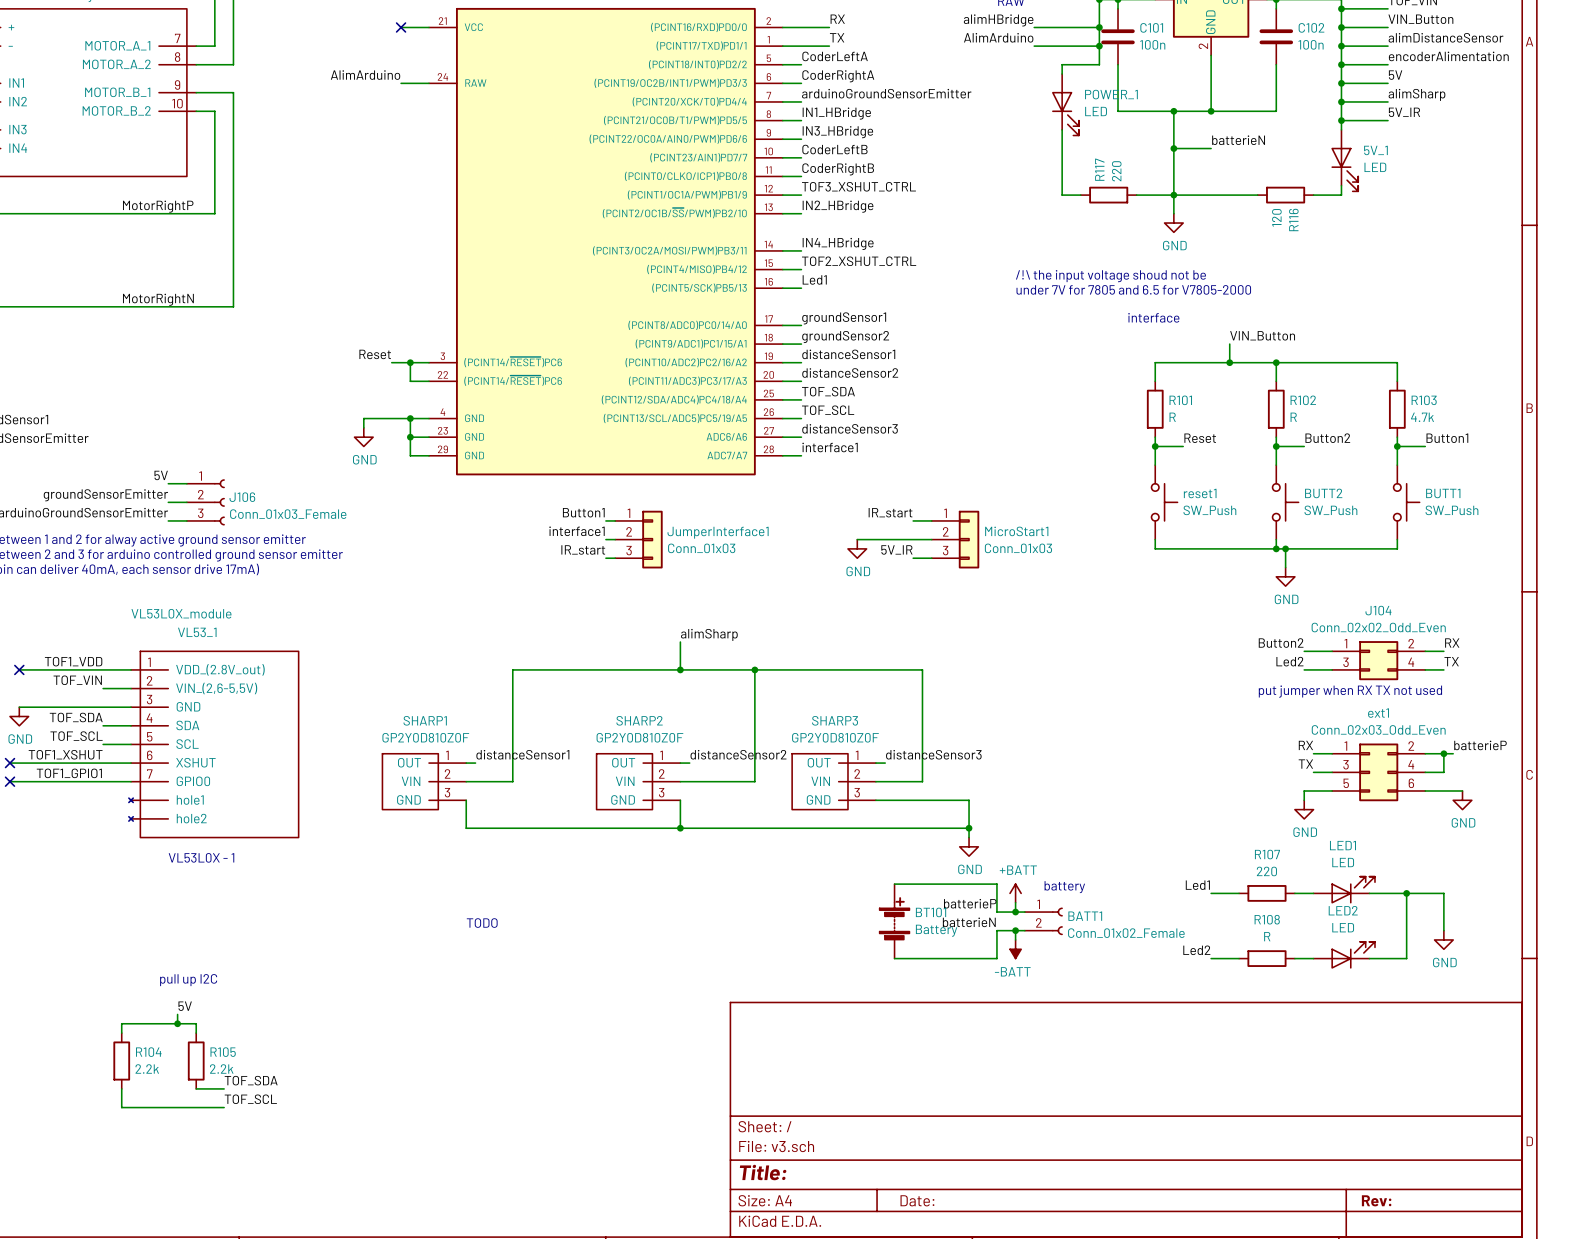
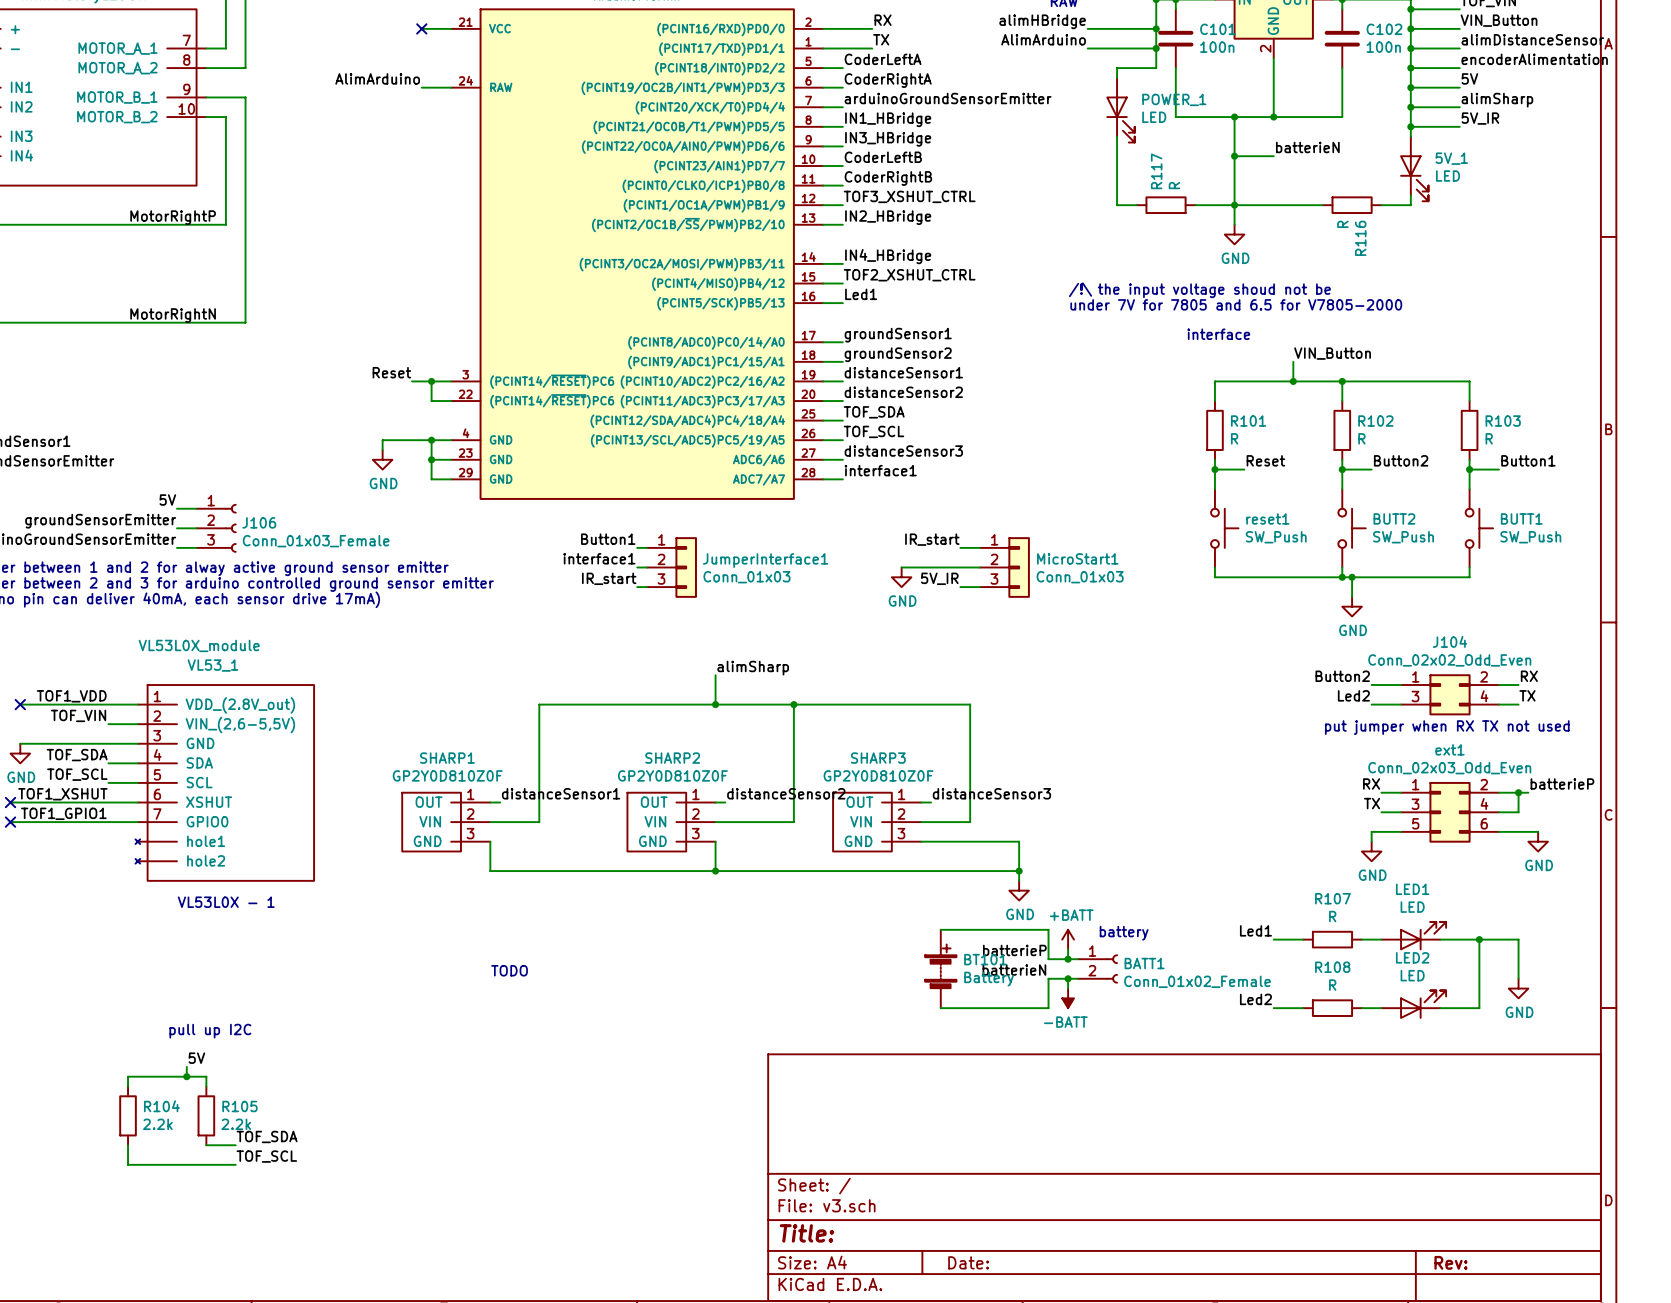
R117 value: 220 (1116, 171) -> R (1174, 185)
R116 value: 120 (1276, 217) -> R (1342, 224)
R103 value: 4.7k (1422, 417) -> R (1489, 438)
R107 value: 220 (1266, 871) -> R (1332, 916)

